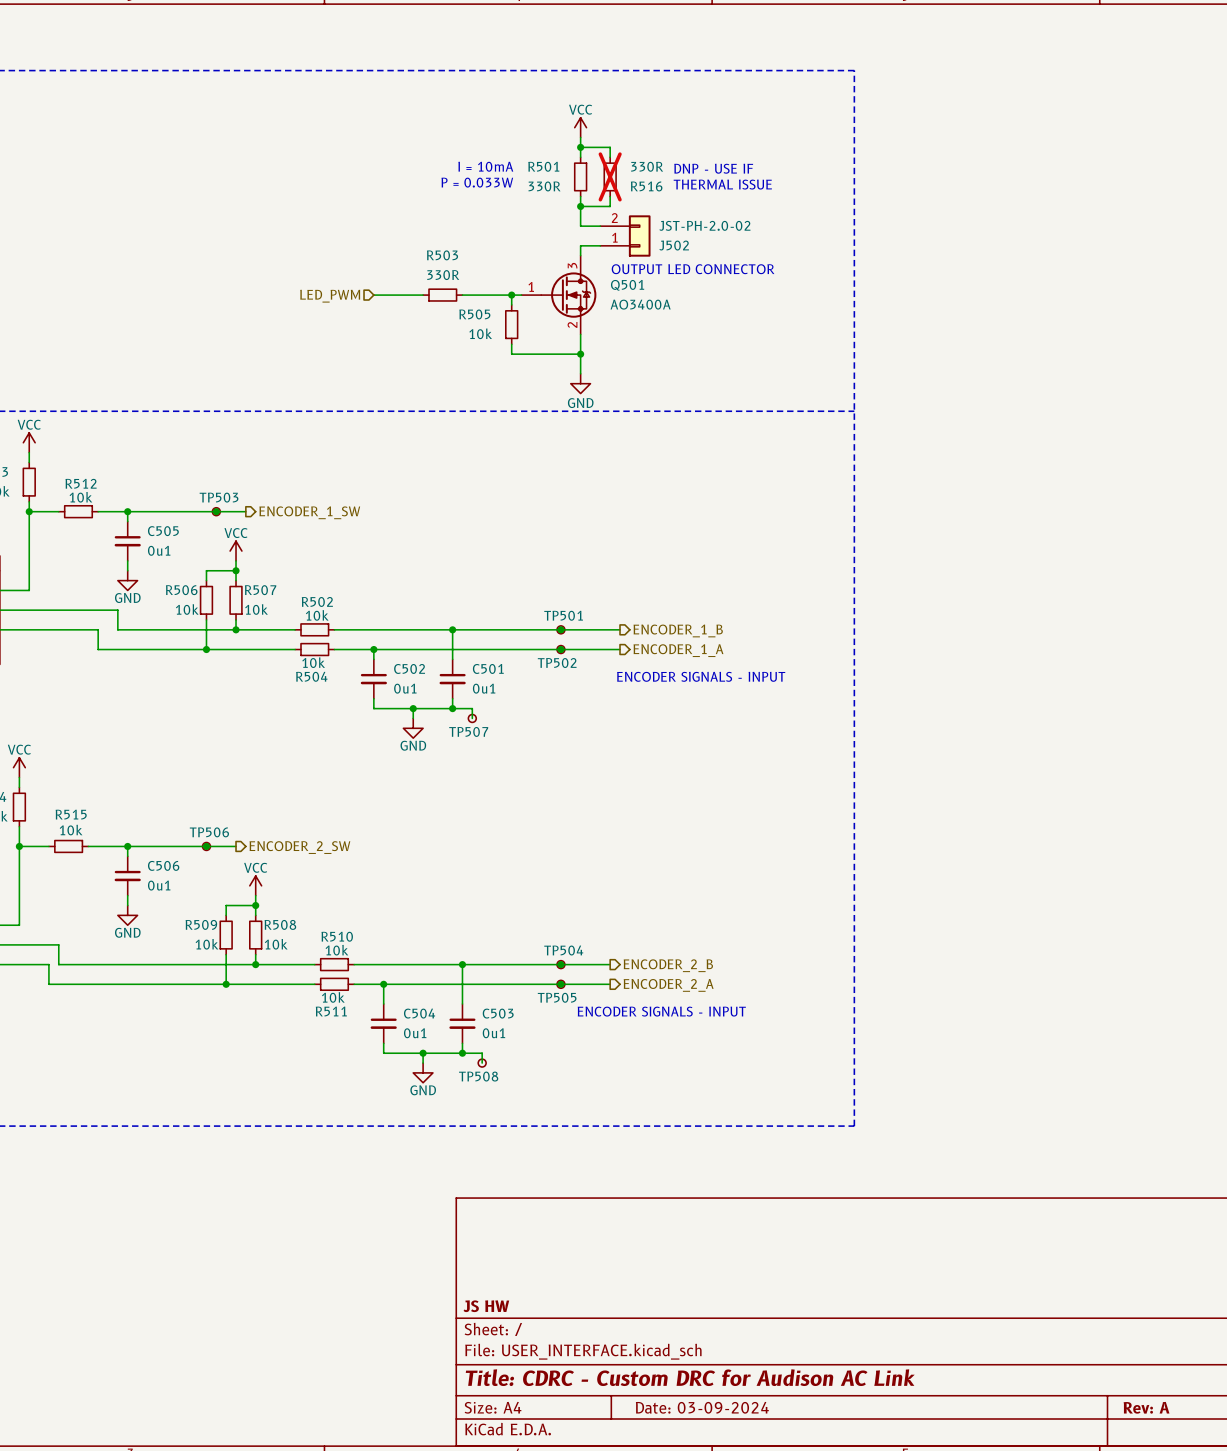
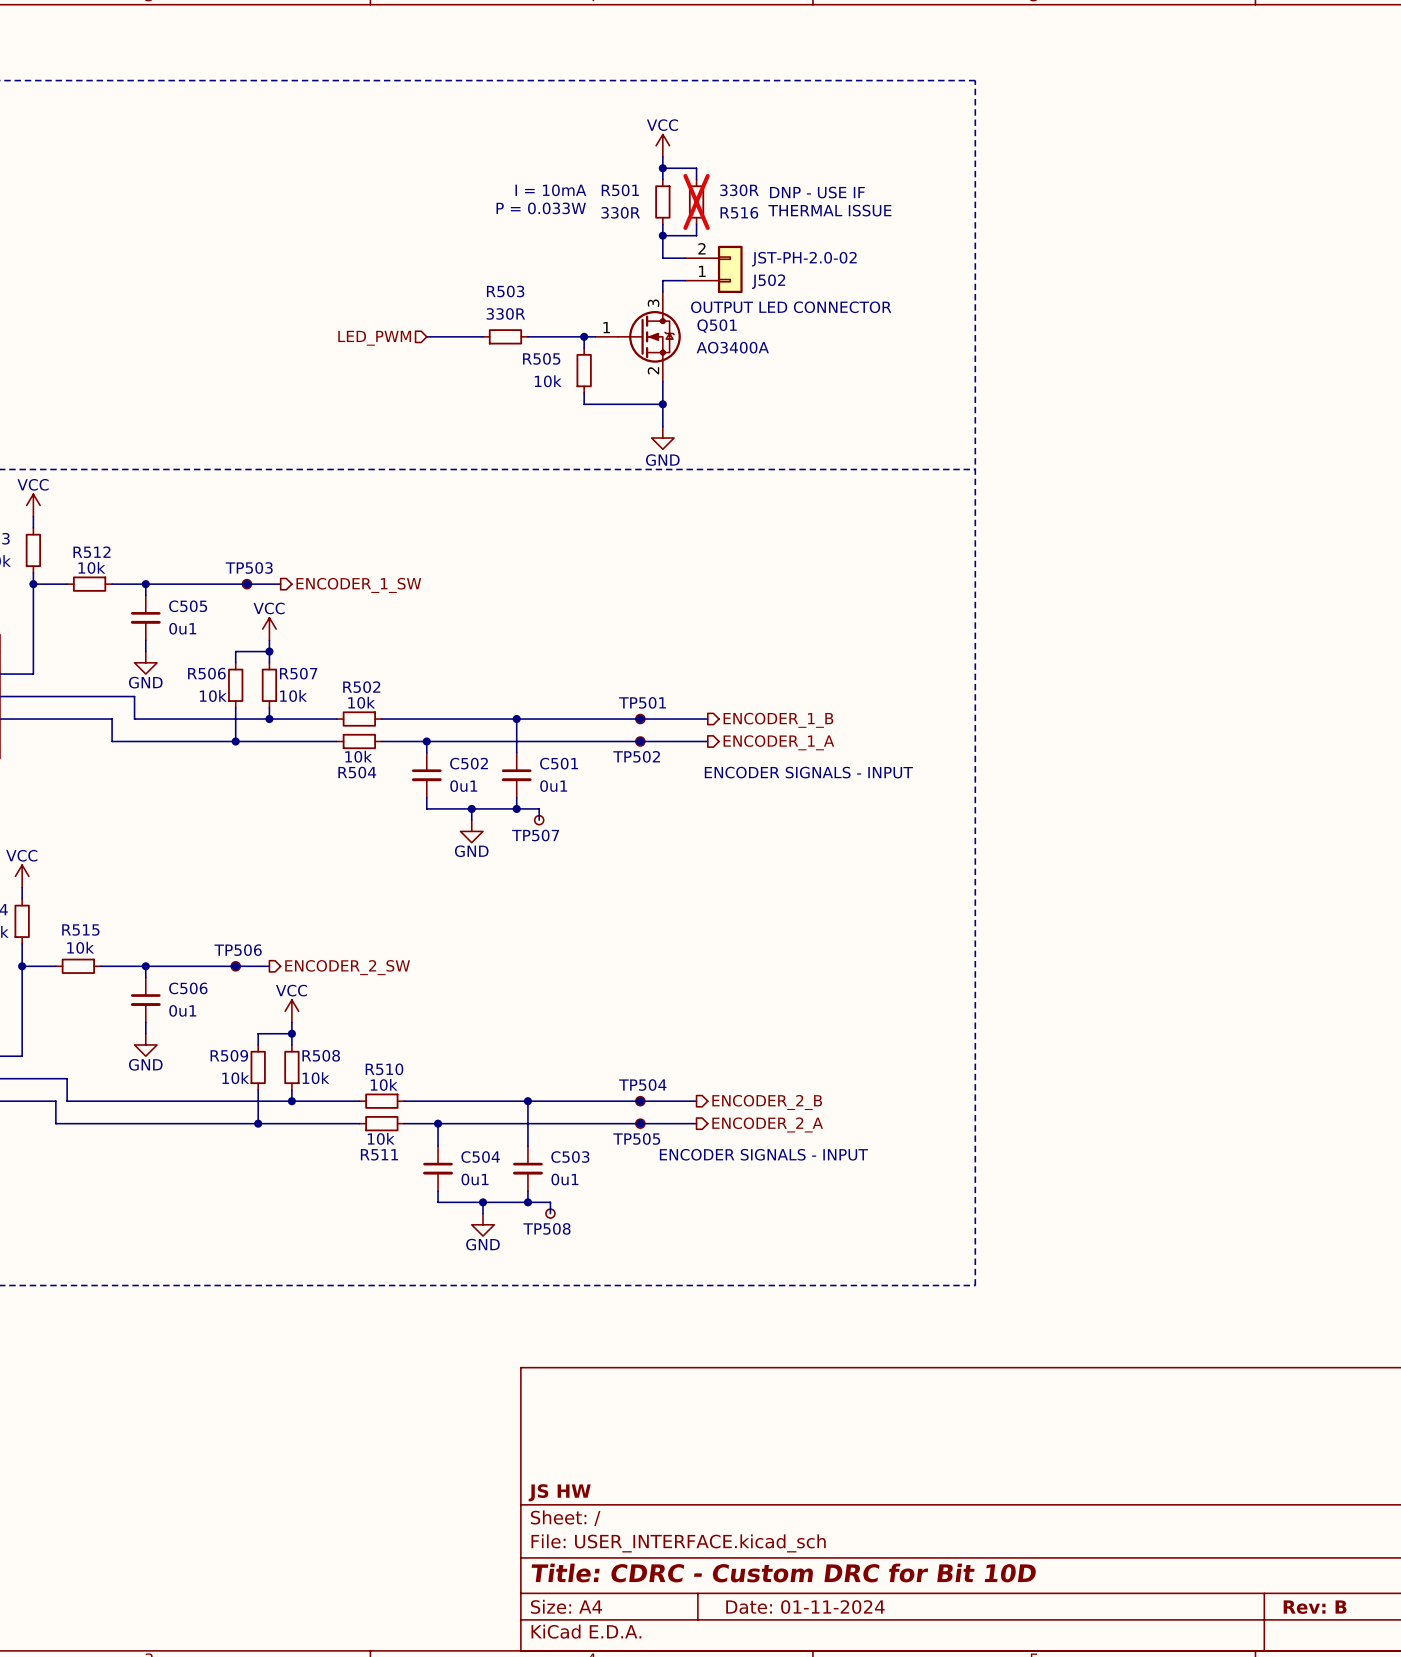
title block: Title: CDRC - Custom DRC for Audison AC Link (690, 1377) -> Title: CDRC - Custom DRC for Bit 10D (783, 1573)
title block: Date: 03-09-2024 (702, 1407) -> Date: 01-11-2024 (805, 1607)
title block: Rev: A (1146, 1407) -> Rev: B (1315, 1607)

